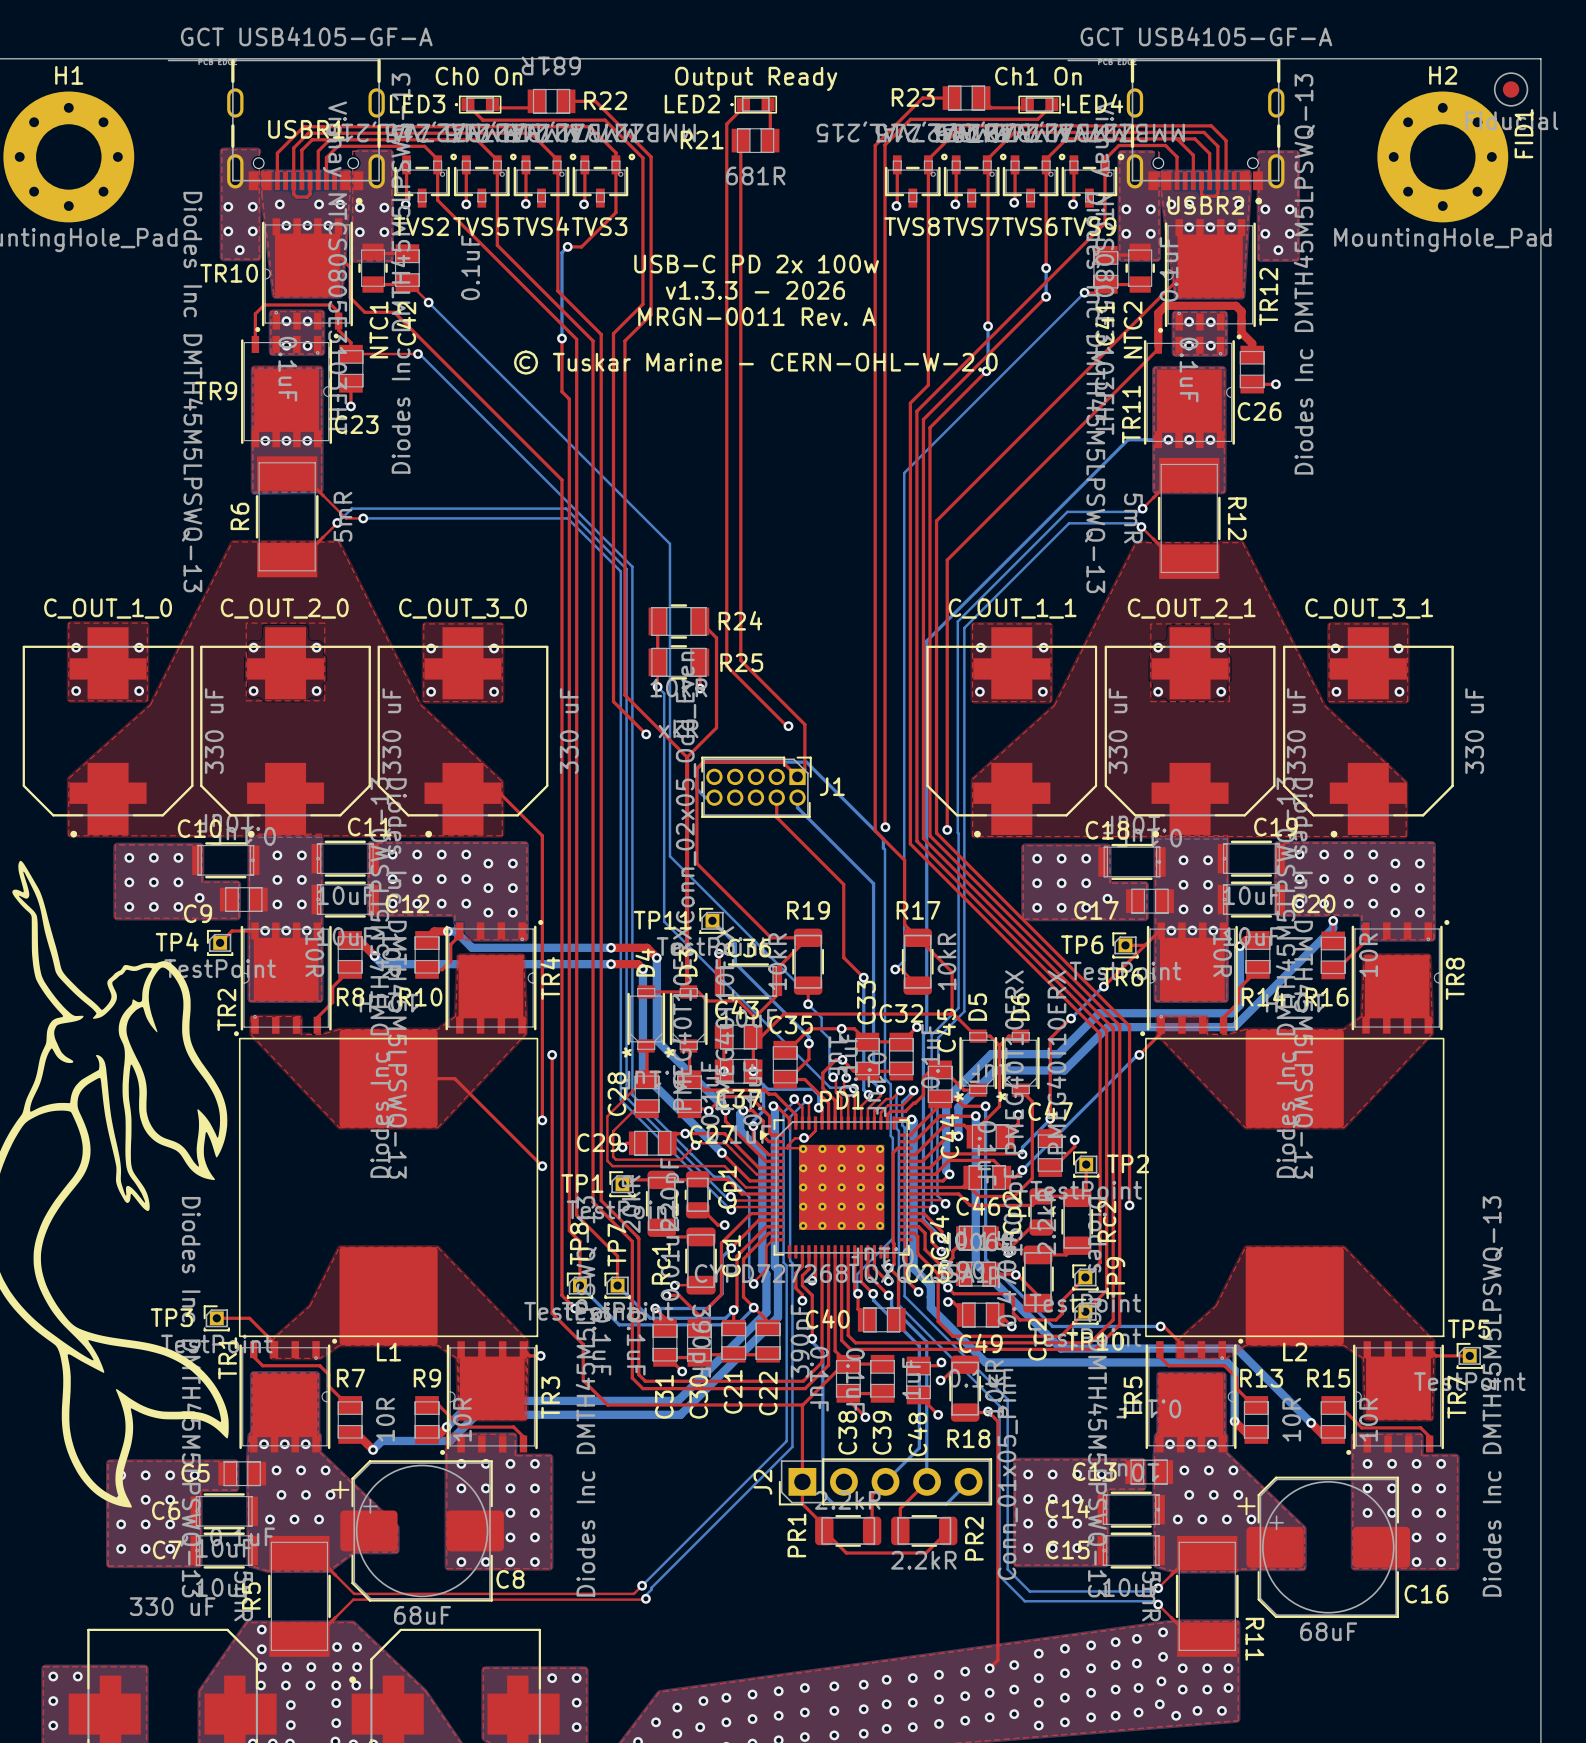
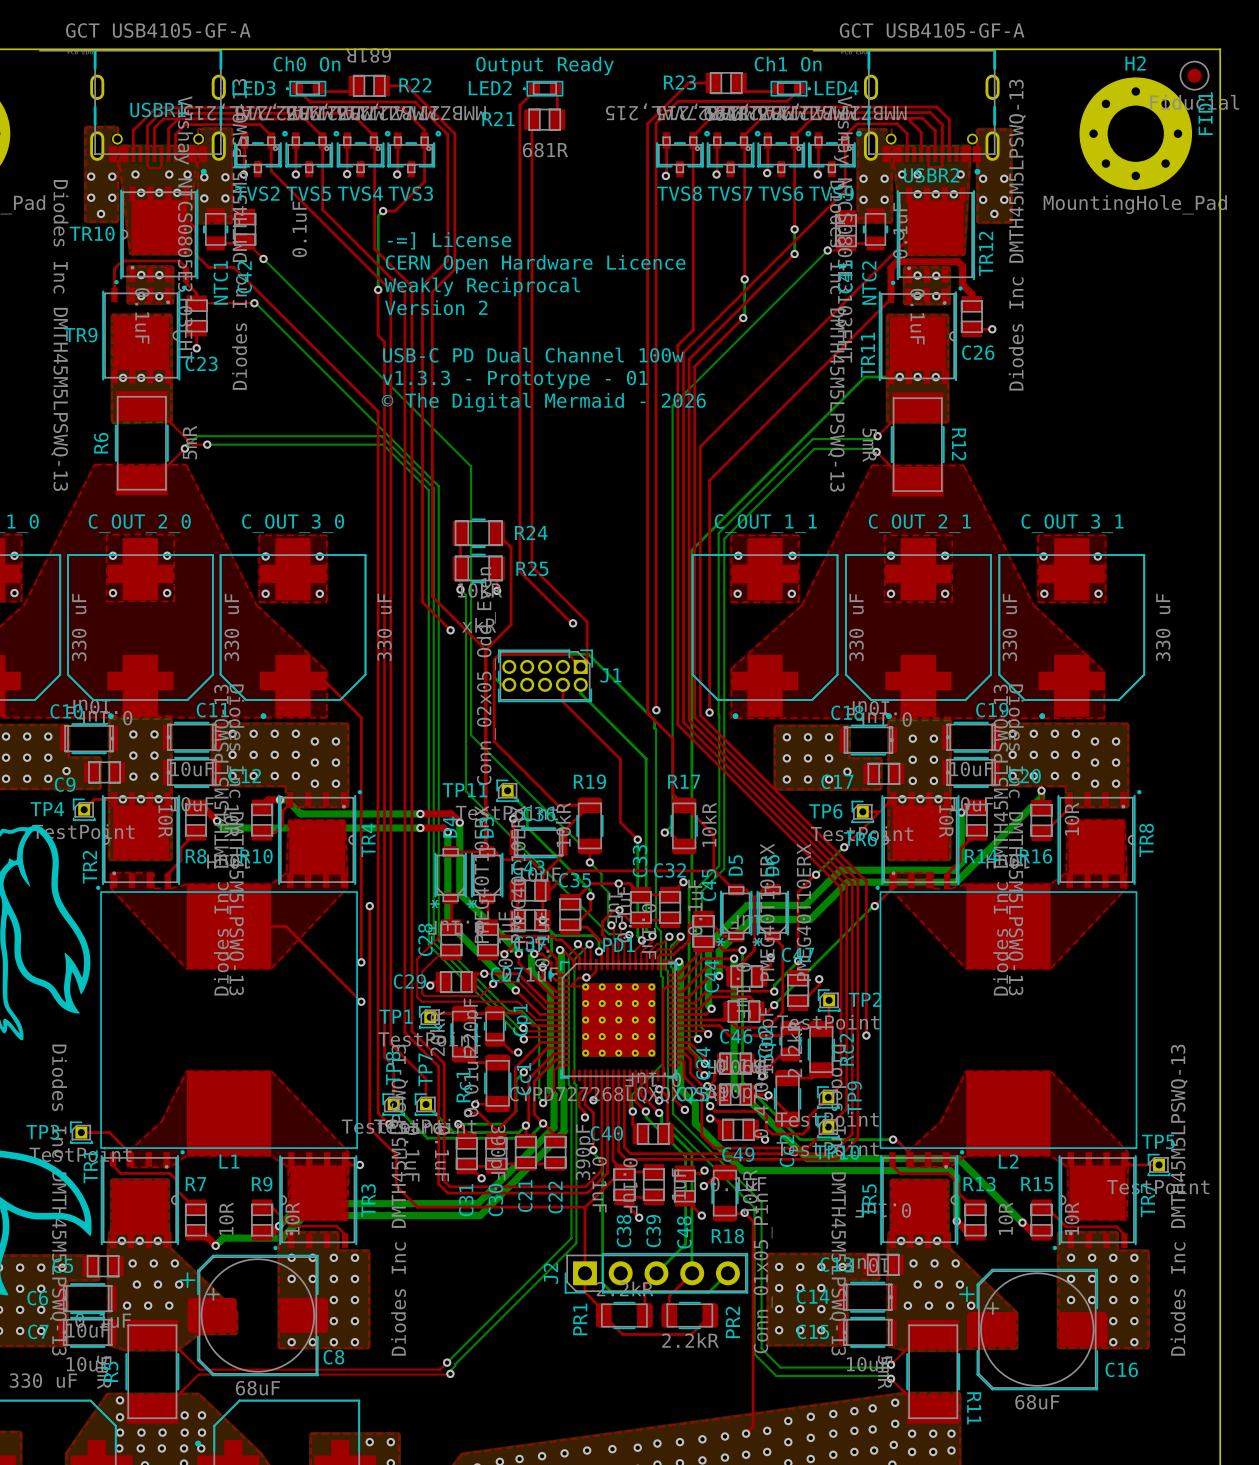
text: USB-C PD 2x 100w (756, 264) -> none
text: none -> -=] License (449, 240)
text: v1.3.3 - 2026 (755, 290) -> none
text: none -> CERN Open Hardware Licence (535, 264)
text: MRGN-0011 Rev. A (756, 316) -> none
text: none -> Weakly Reciprocal (482, 286)
text: none -> Version 2 (436, 307)
text: © Tuskar Marine - CERN-OHL-W-2.0 (755, 362) -> none
text: none -> USB-C PD Dual Channel 100w (533, 355)
text: none -> v1.3.3 - Prototype - 01 (515, 379)
text: none -> © The Digital Mermaid - 2026 (543, 402)

